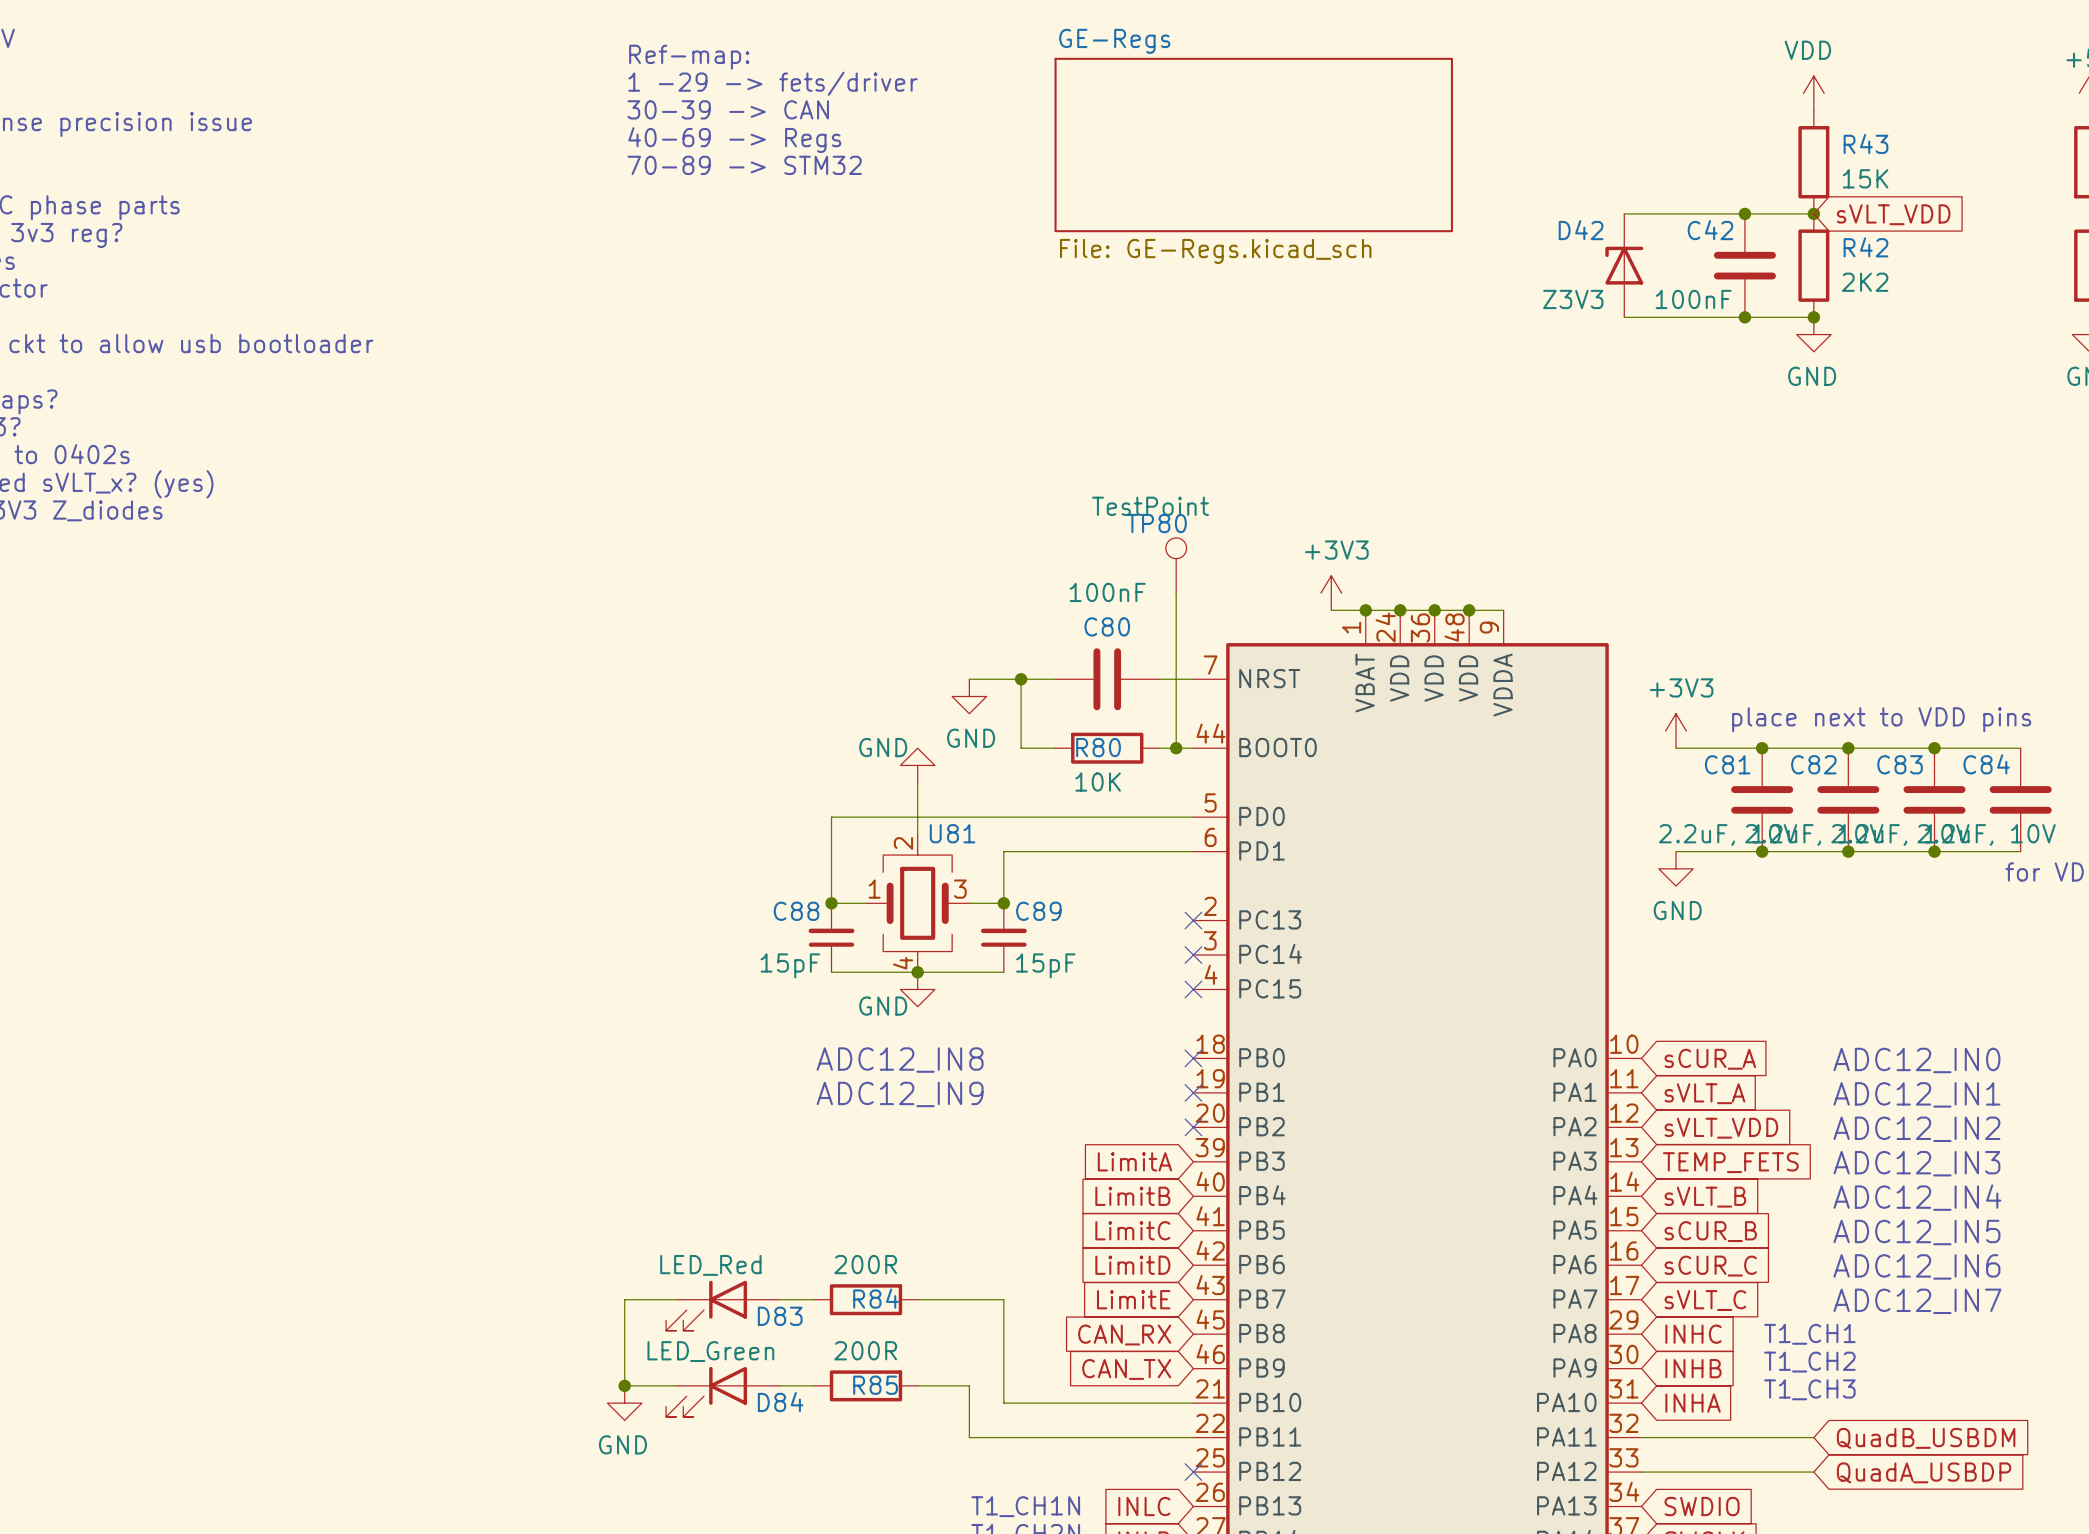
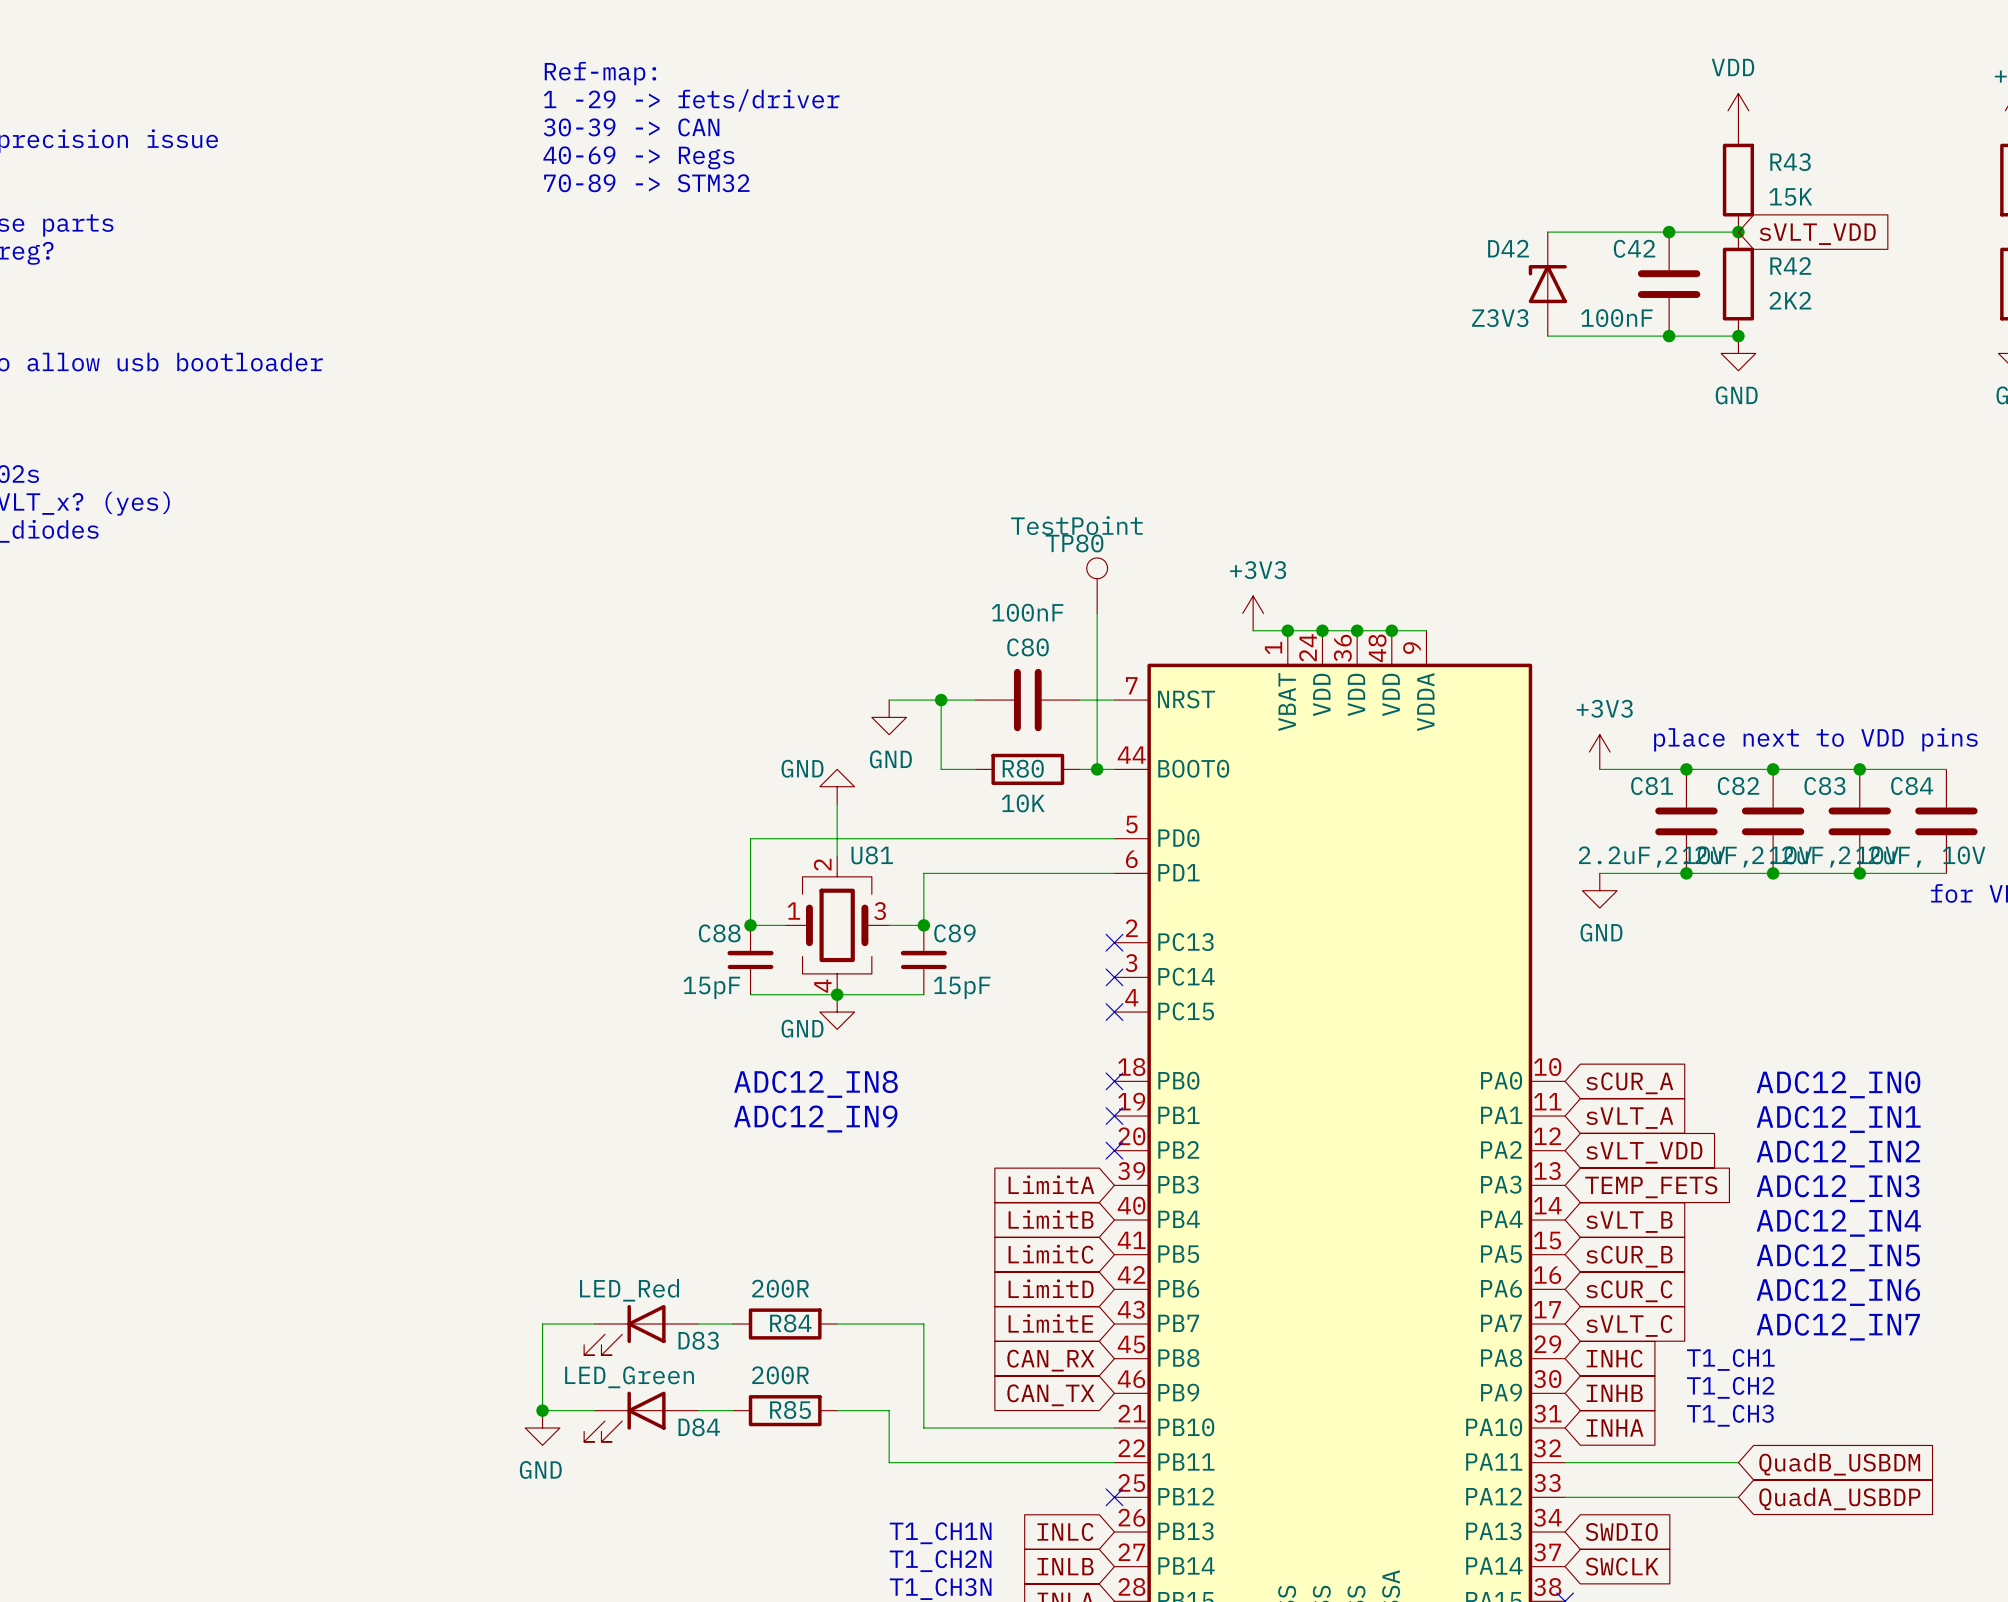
sheet GE-Regs: File: GE-Regs.kicad_sch (1253, 145) -> none

